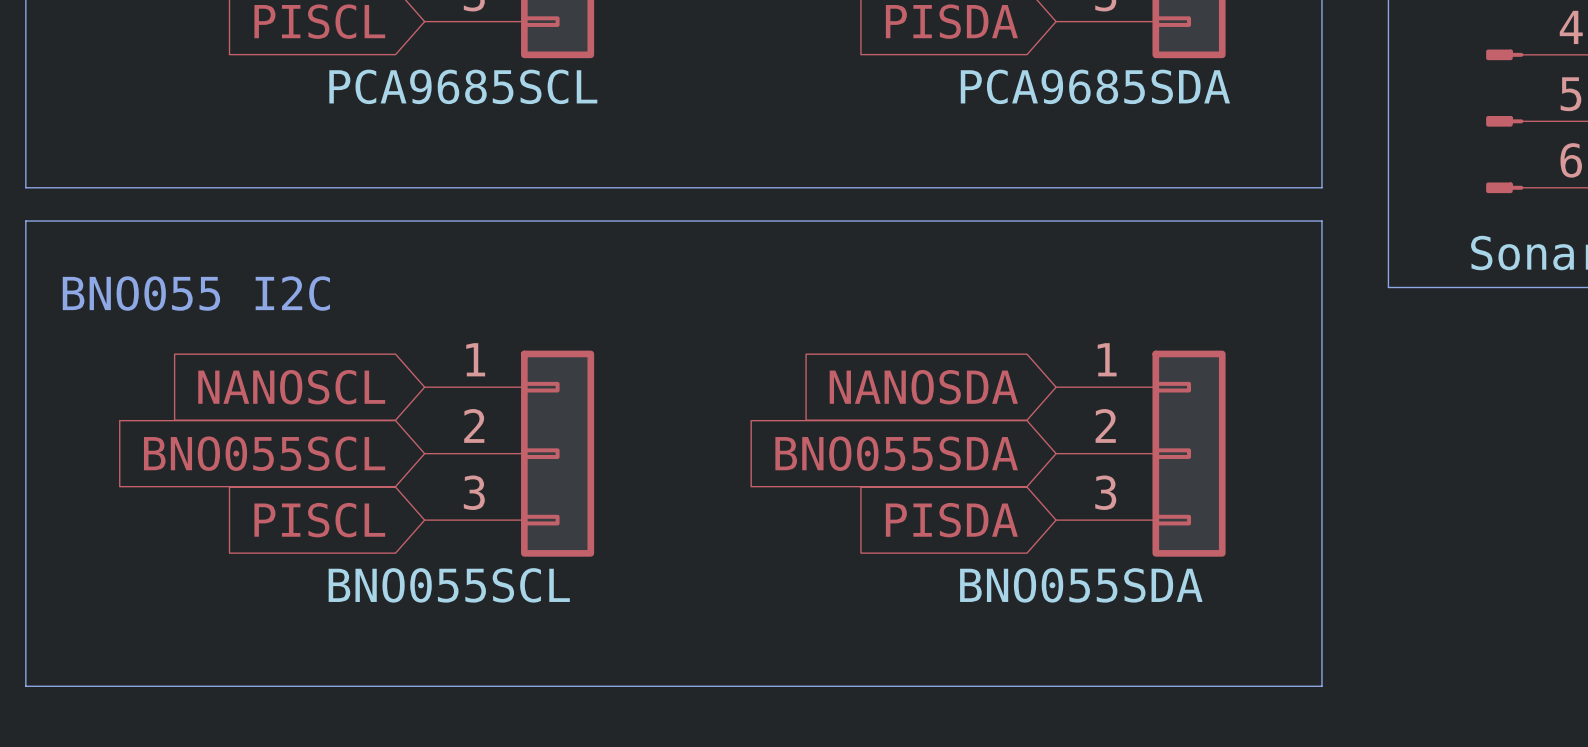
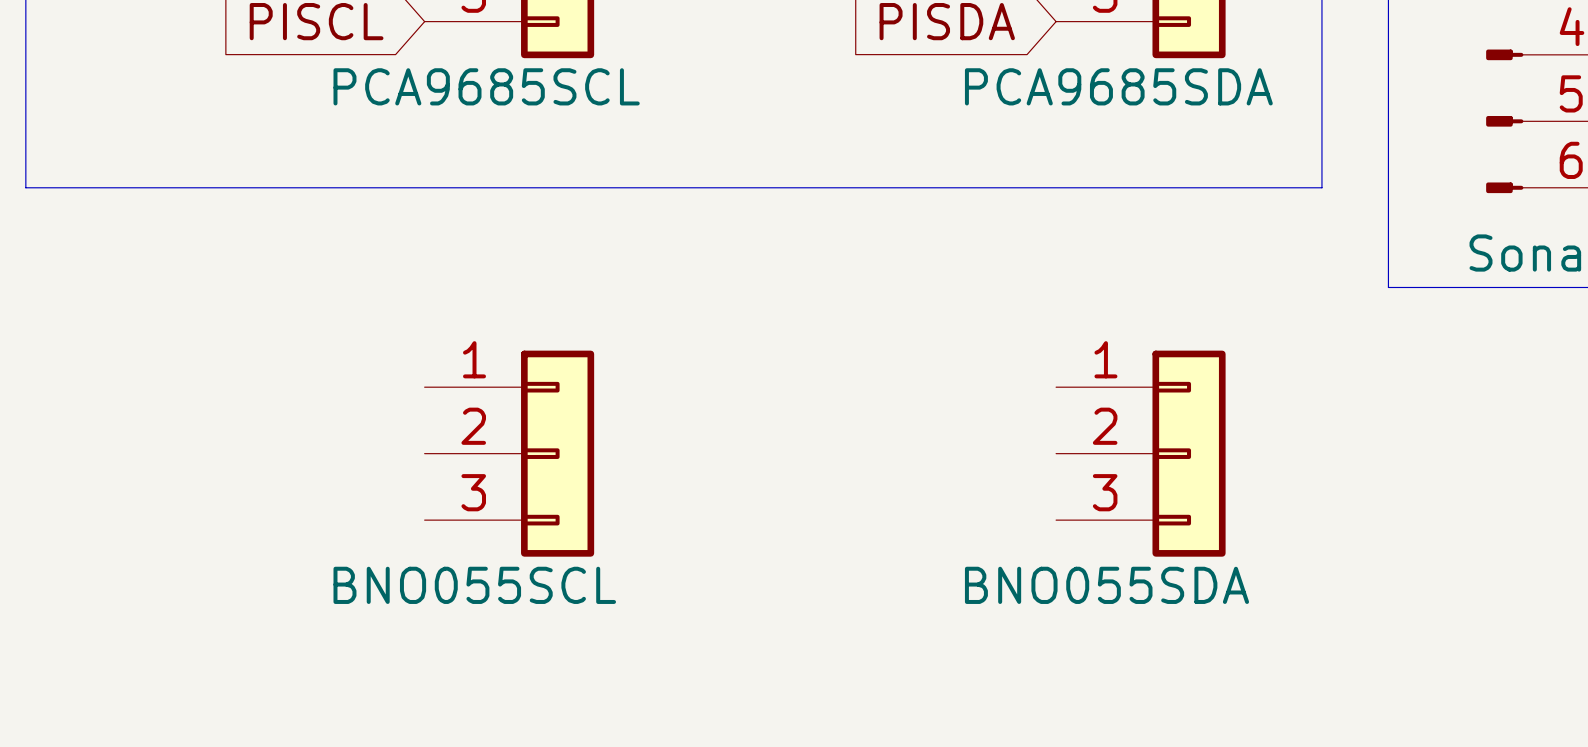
line: (25, 221) (1321, 221) (1321, 686) (25, 686) (25, 221) -> none
text: BNO055 I2C (196, 293) -> none
global label: NANOSCL (291, 387) -> none
global label: NANOSDA (923, 387) -> none
global label: BNO055SCL (264, 453) -> none
global label: BNO055SDA (896, 453) -> none
global label: PISCL (319, 520) -> none
global label: PISDA (951, 520) -> none

